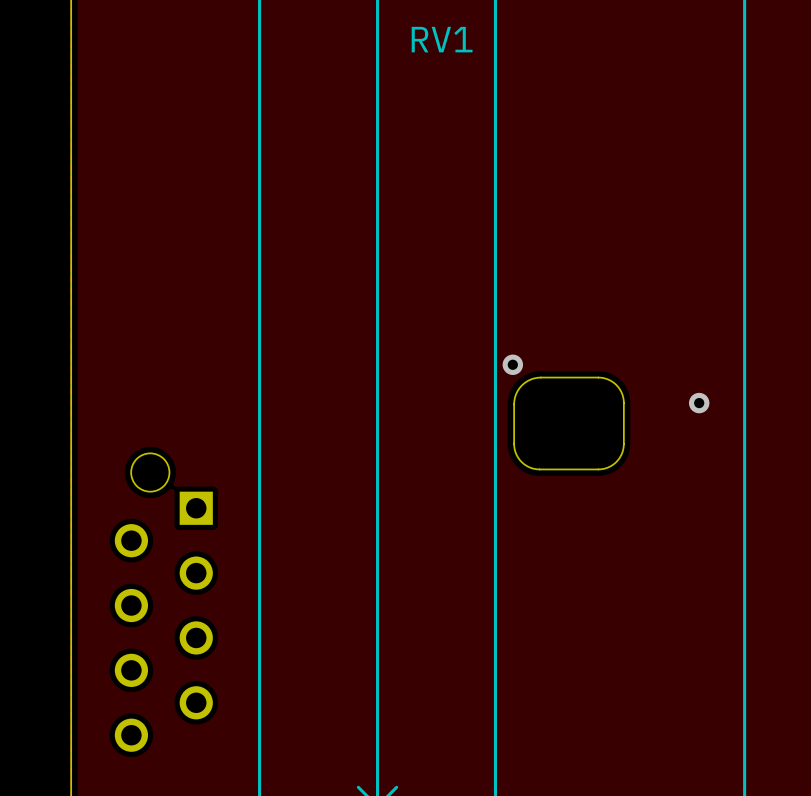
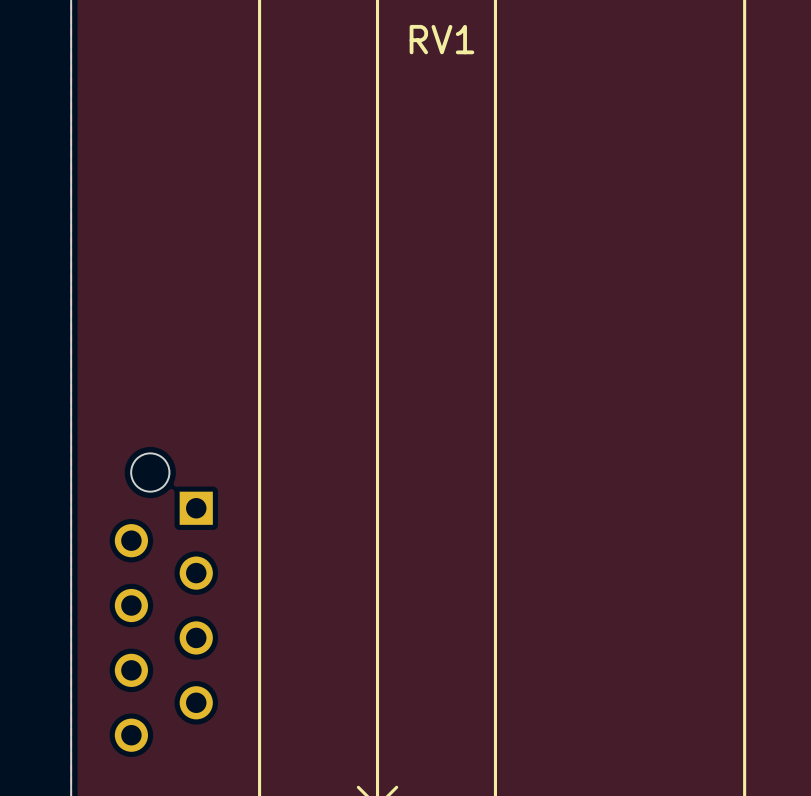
via: (512, 364) -> none
via: (699, 403) -> none
part: (568, 423) -> none

